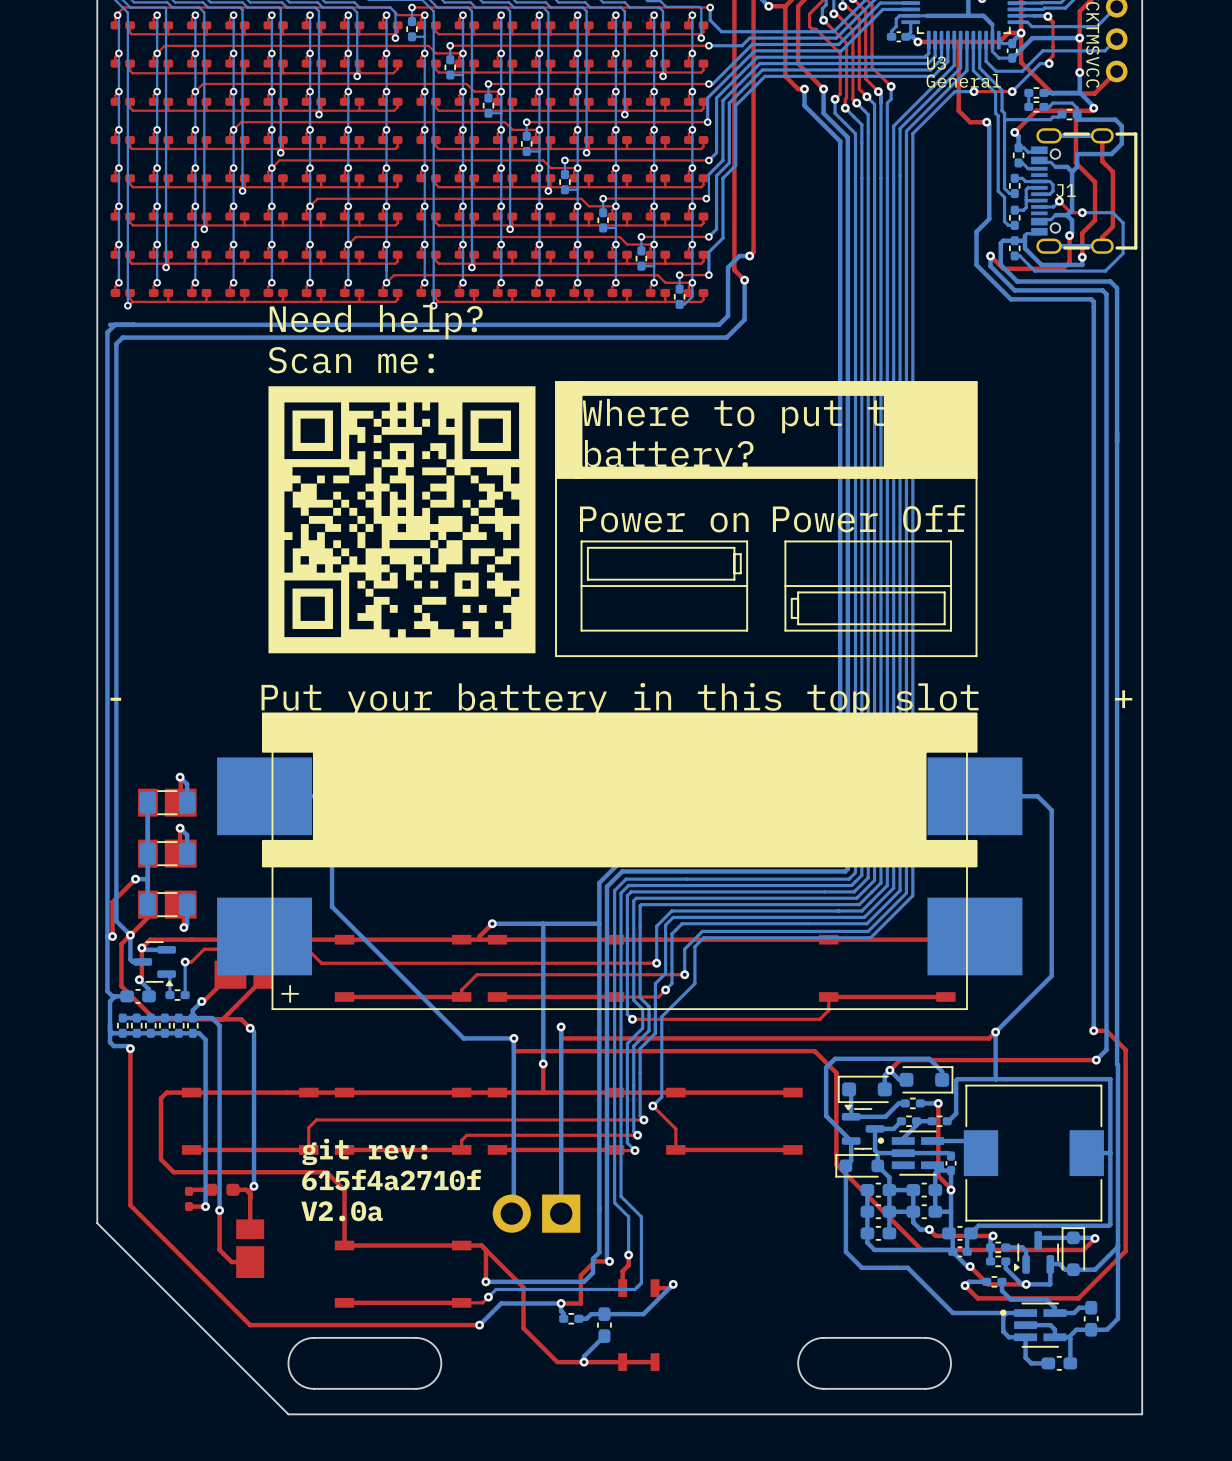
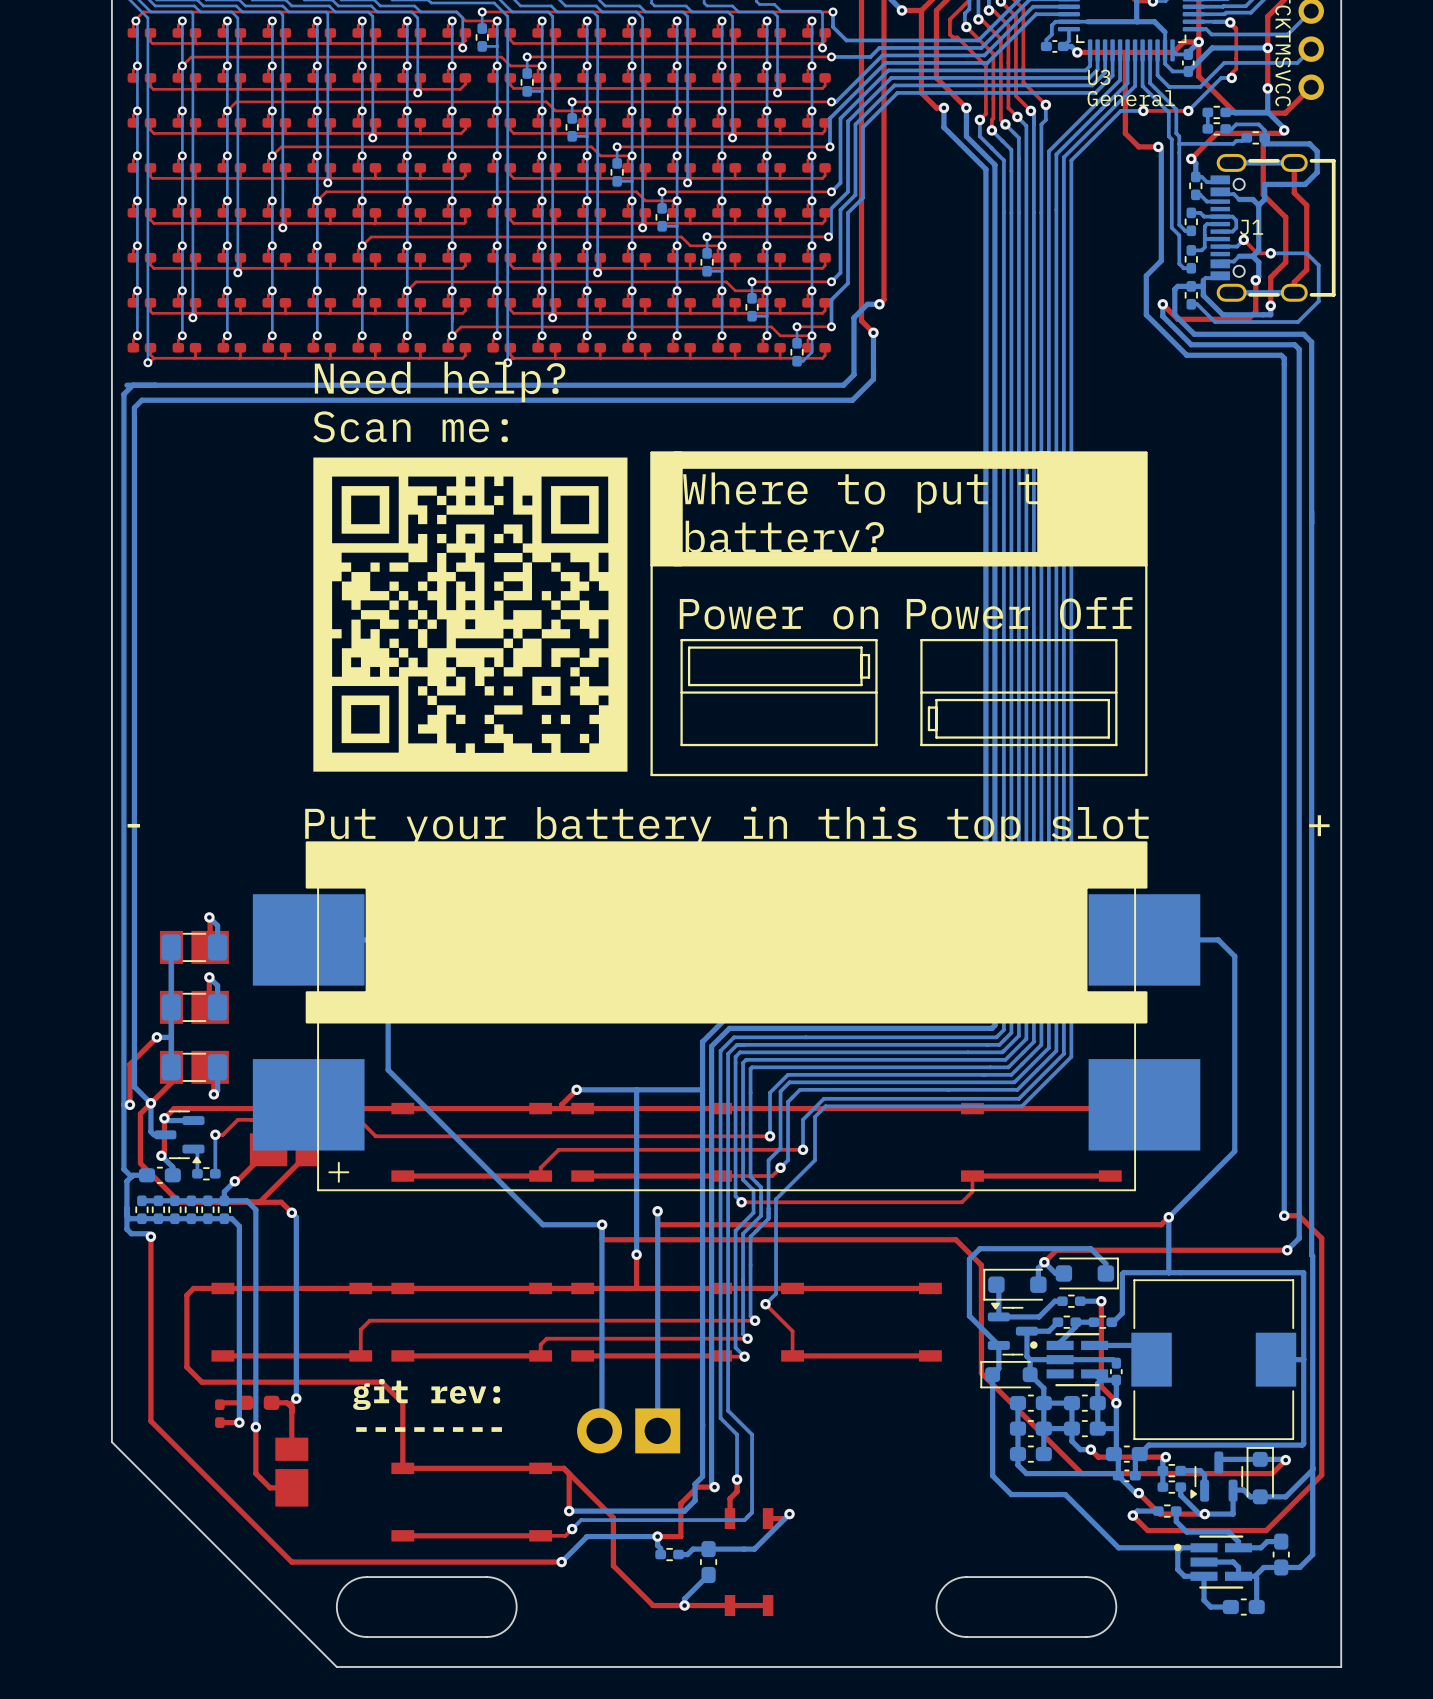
text: git rev: (364, 1151) -> none
text: 615f4a2710f (391, 1180) -> none
text: none -> git rev: (426, 1394)
text: V2.0a (341, 1211) -> none
text: none -> -------- (429, 1429)

